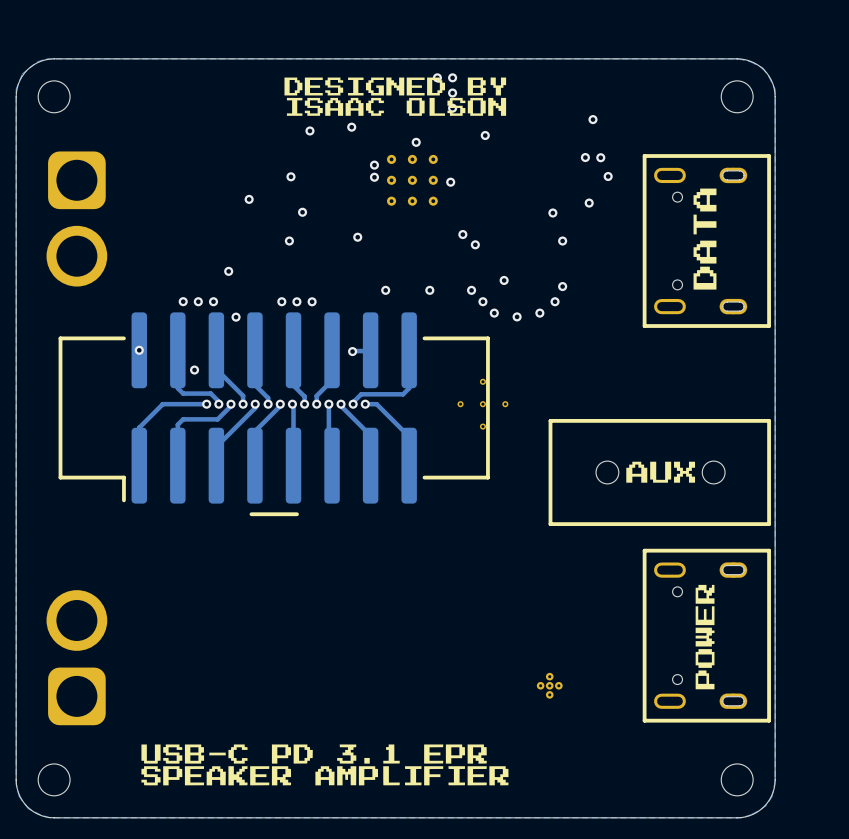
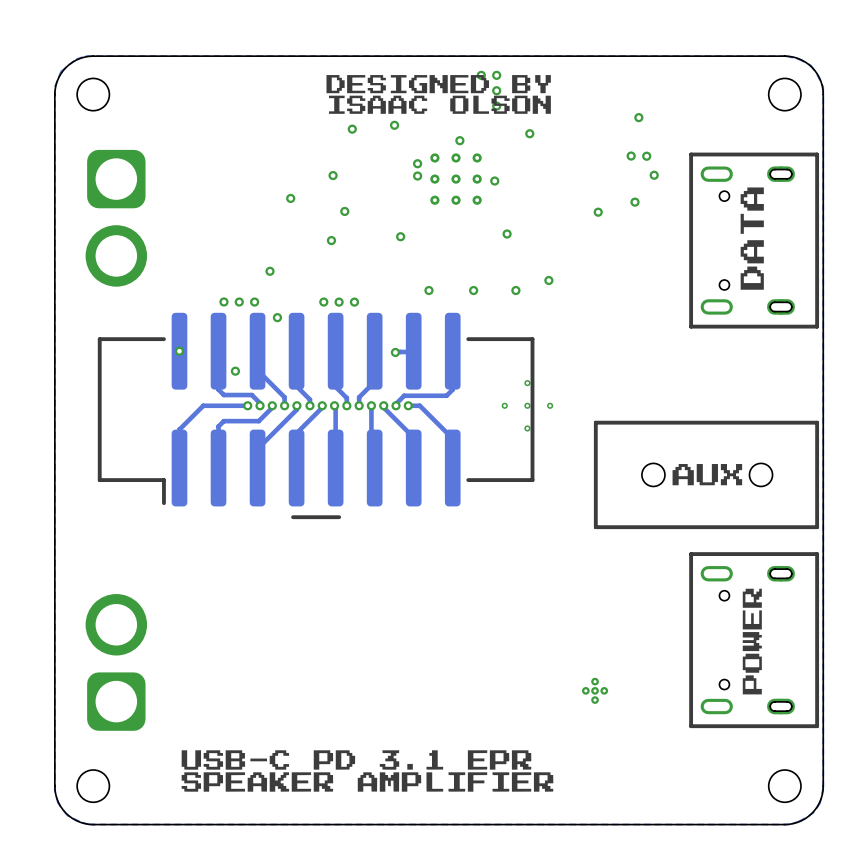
via: (562, 241) -> none
via: (475, 244) -> none
via: (562, 286) -> none
via: (482, 301) -> none
via: (555, 301) -> none
via: (494, 313) -> none
via: (539, 313) -> none
via: (517, 316) -> none

